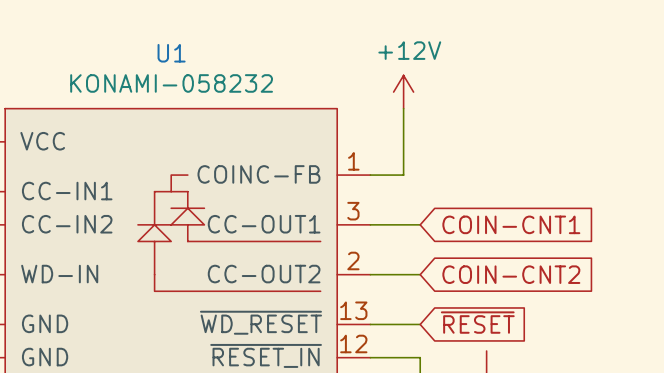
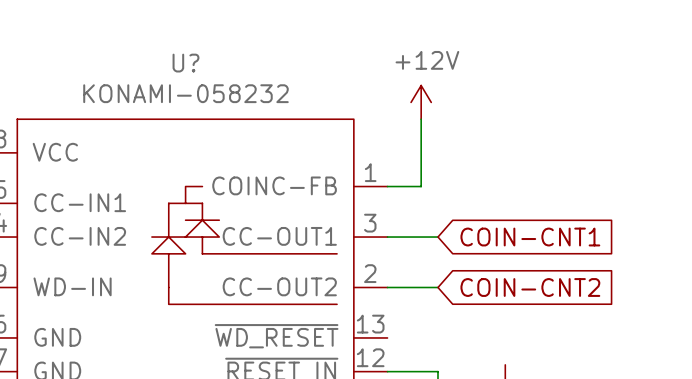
U1 name: U1 (171, 53) -> U? (185, 63)
global label: ~{RESET} (477, 322) -> none
wire: (370, 324) (420, 324) -> none

